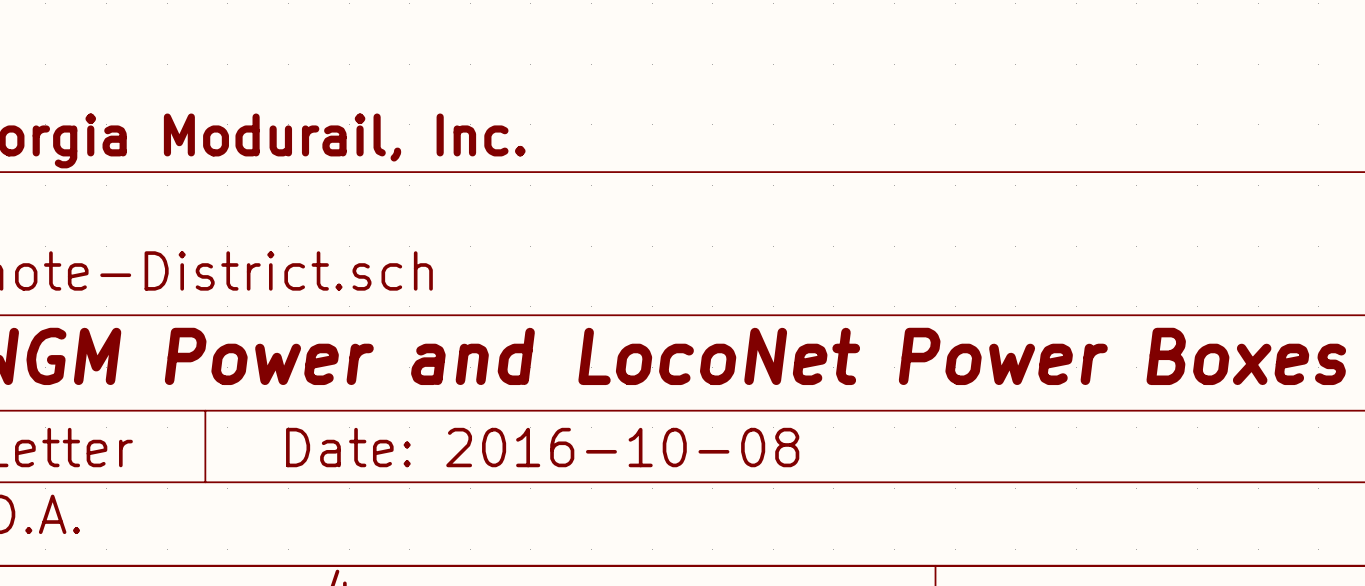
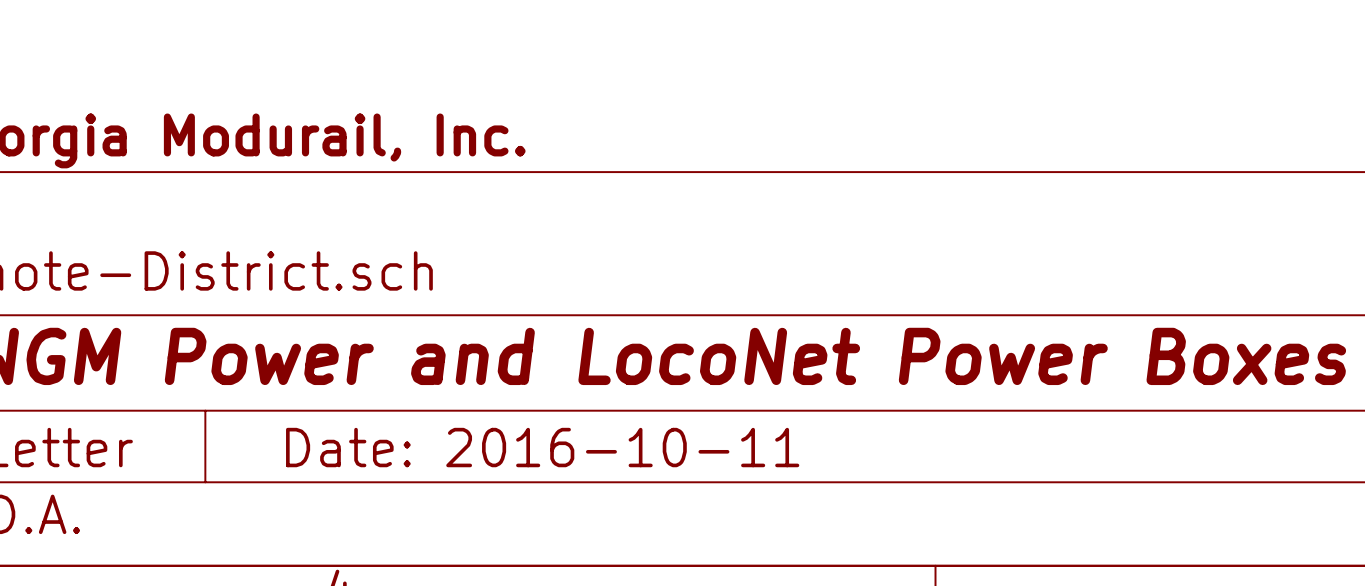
title block: Date: 2016-10-08 (542, 447) -> Date: 2016-10-11 (542, 447)

